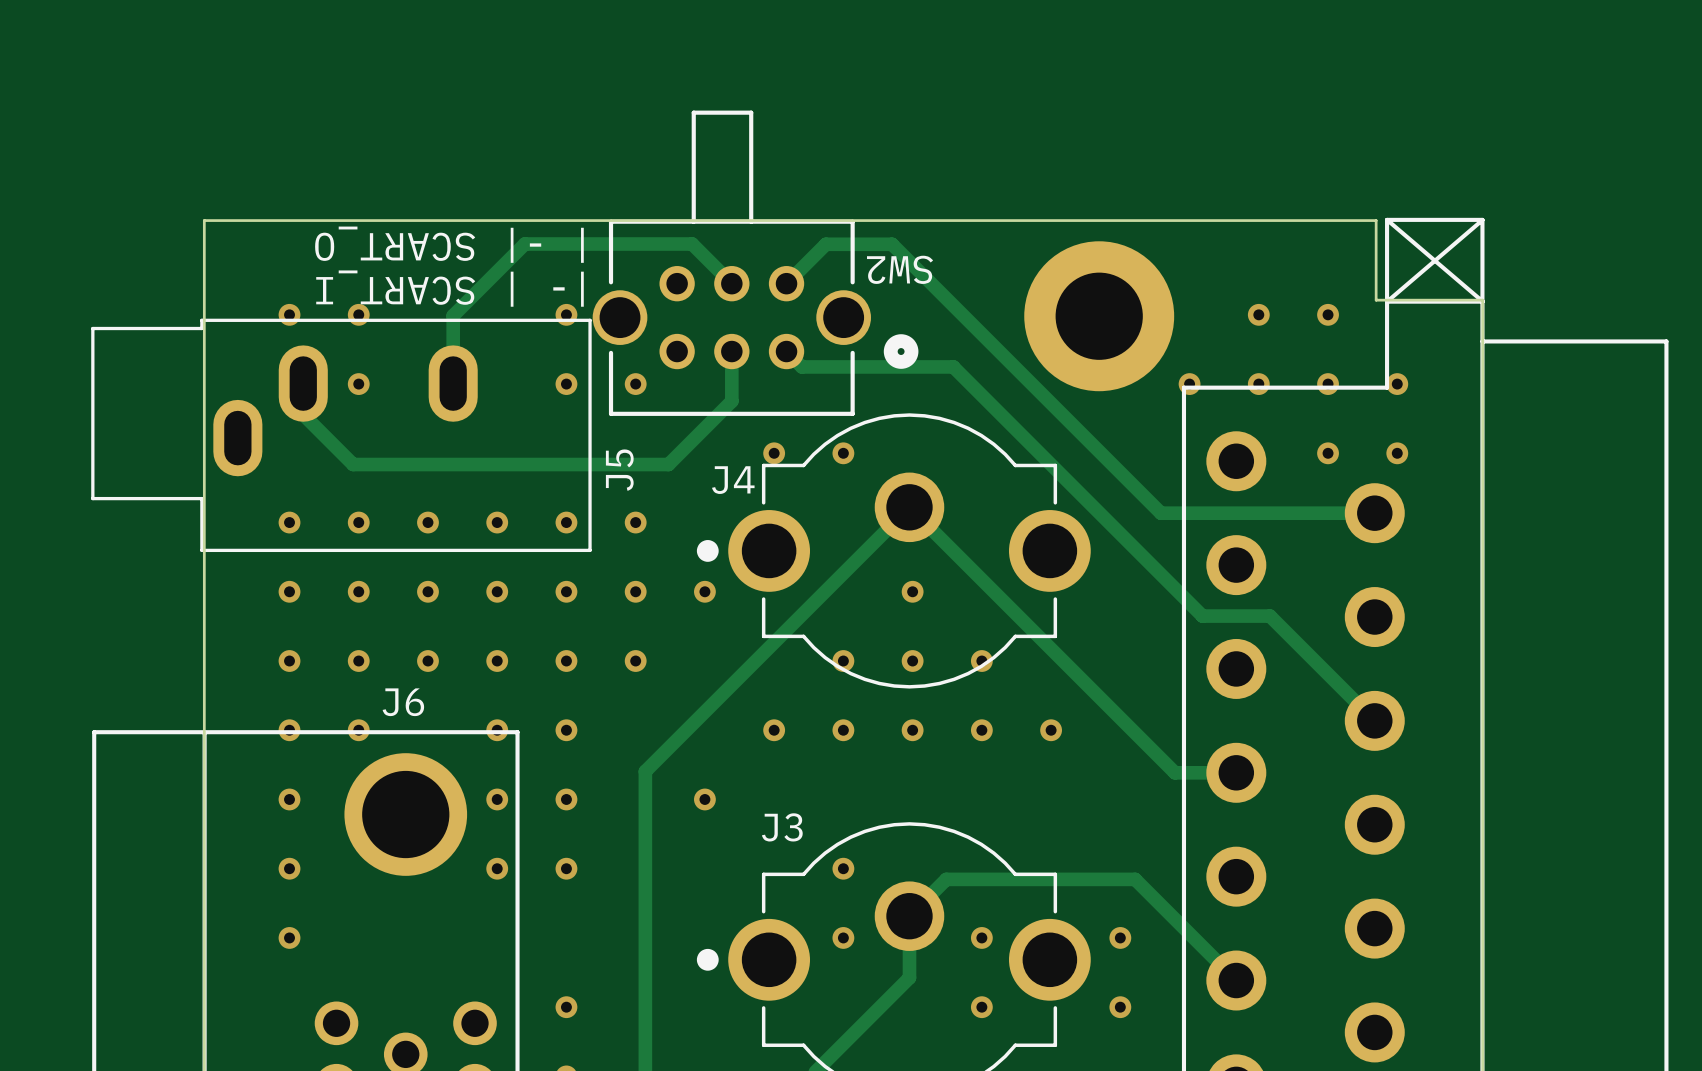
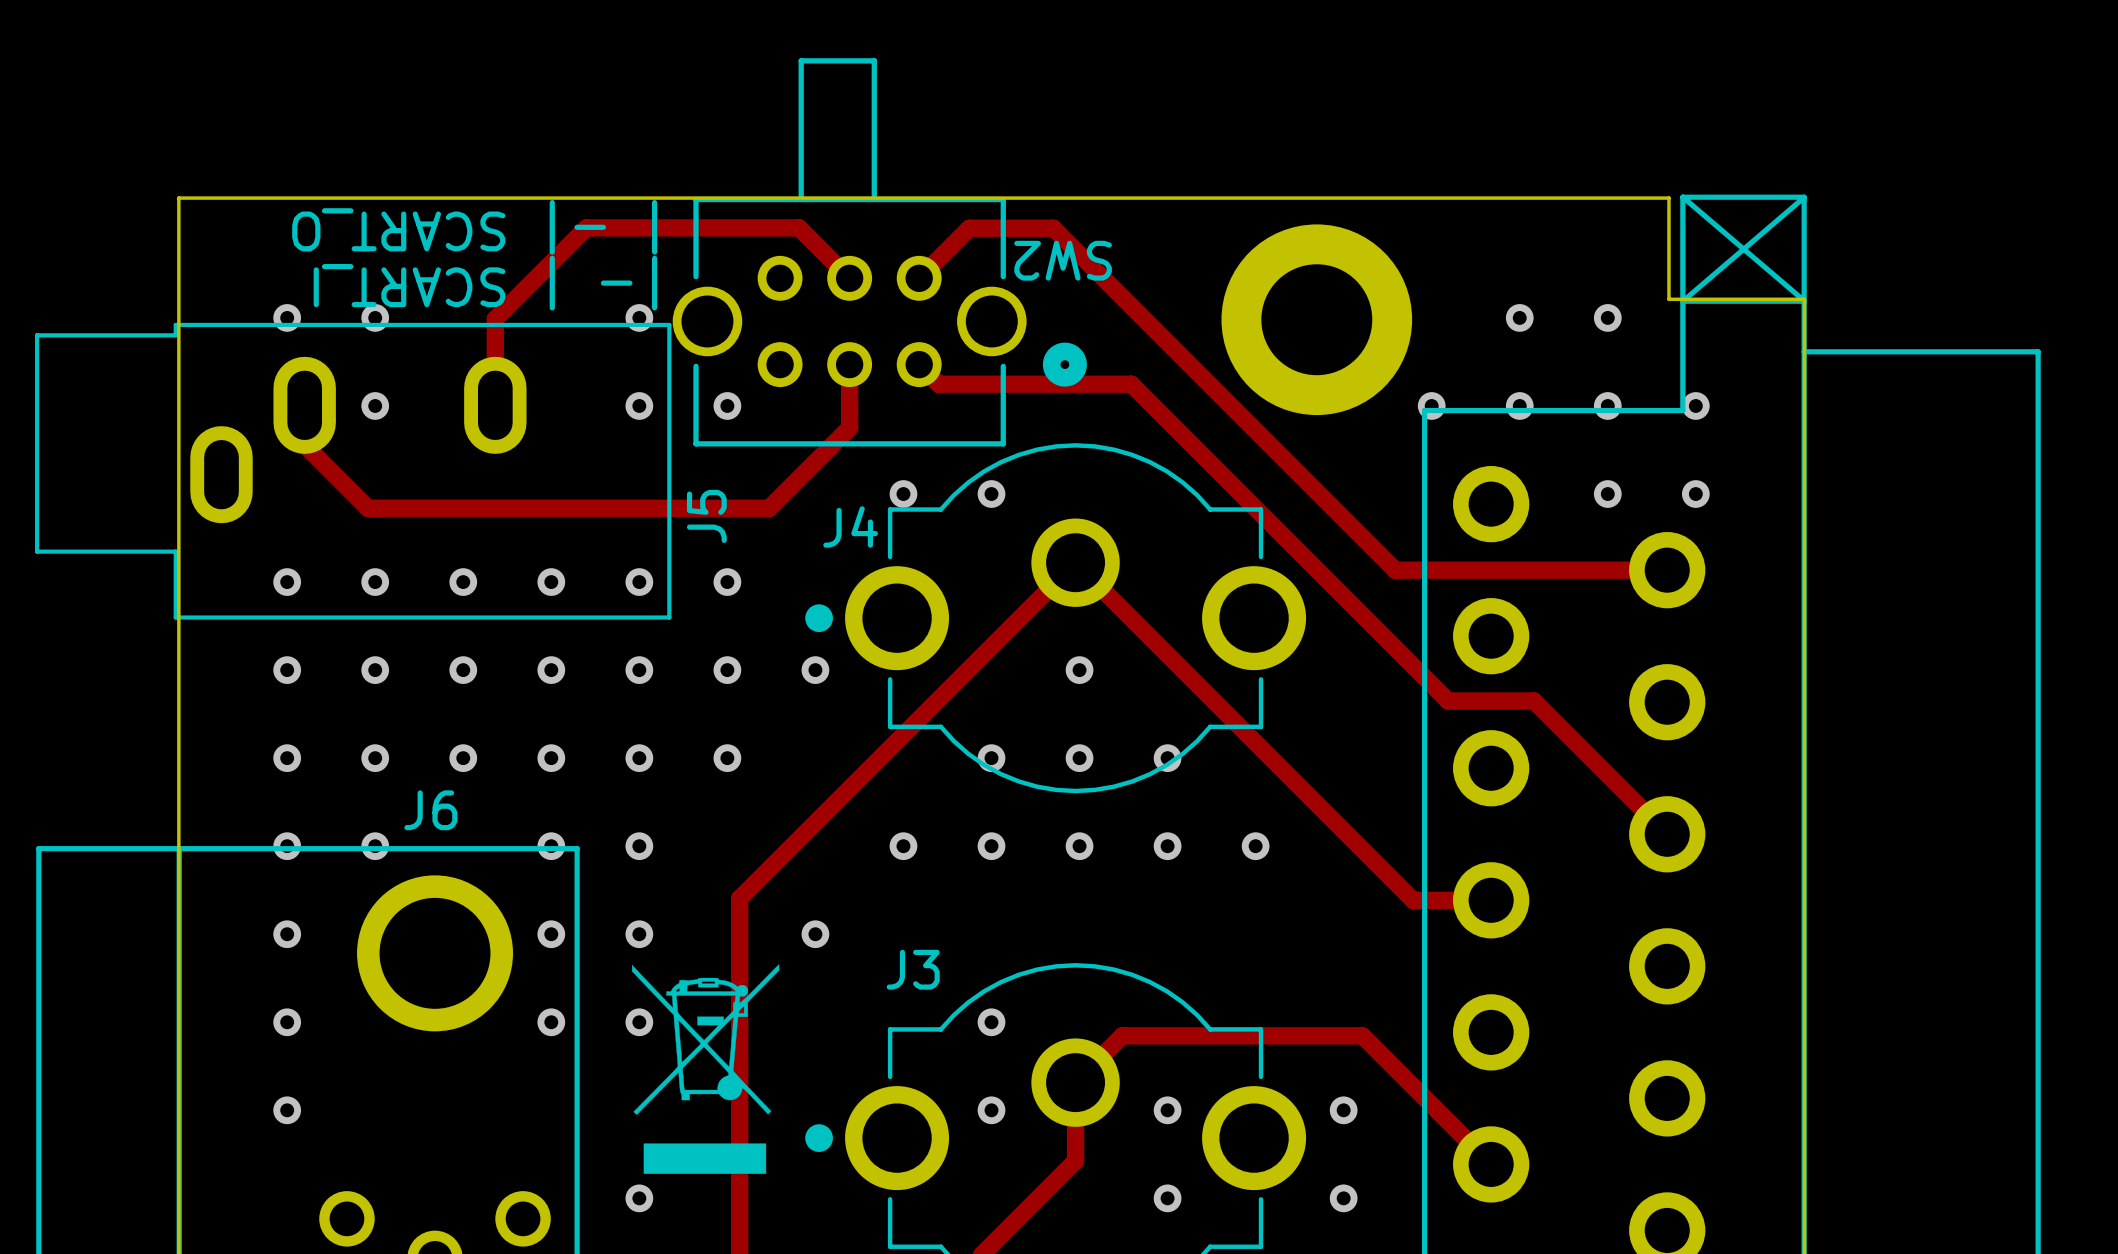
drawing: none -> [631, 964, 780, 1174]

